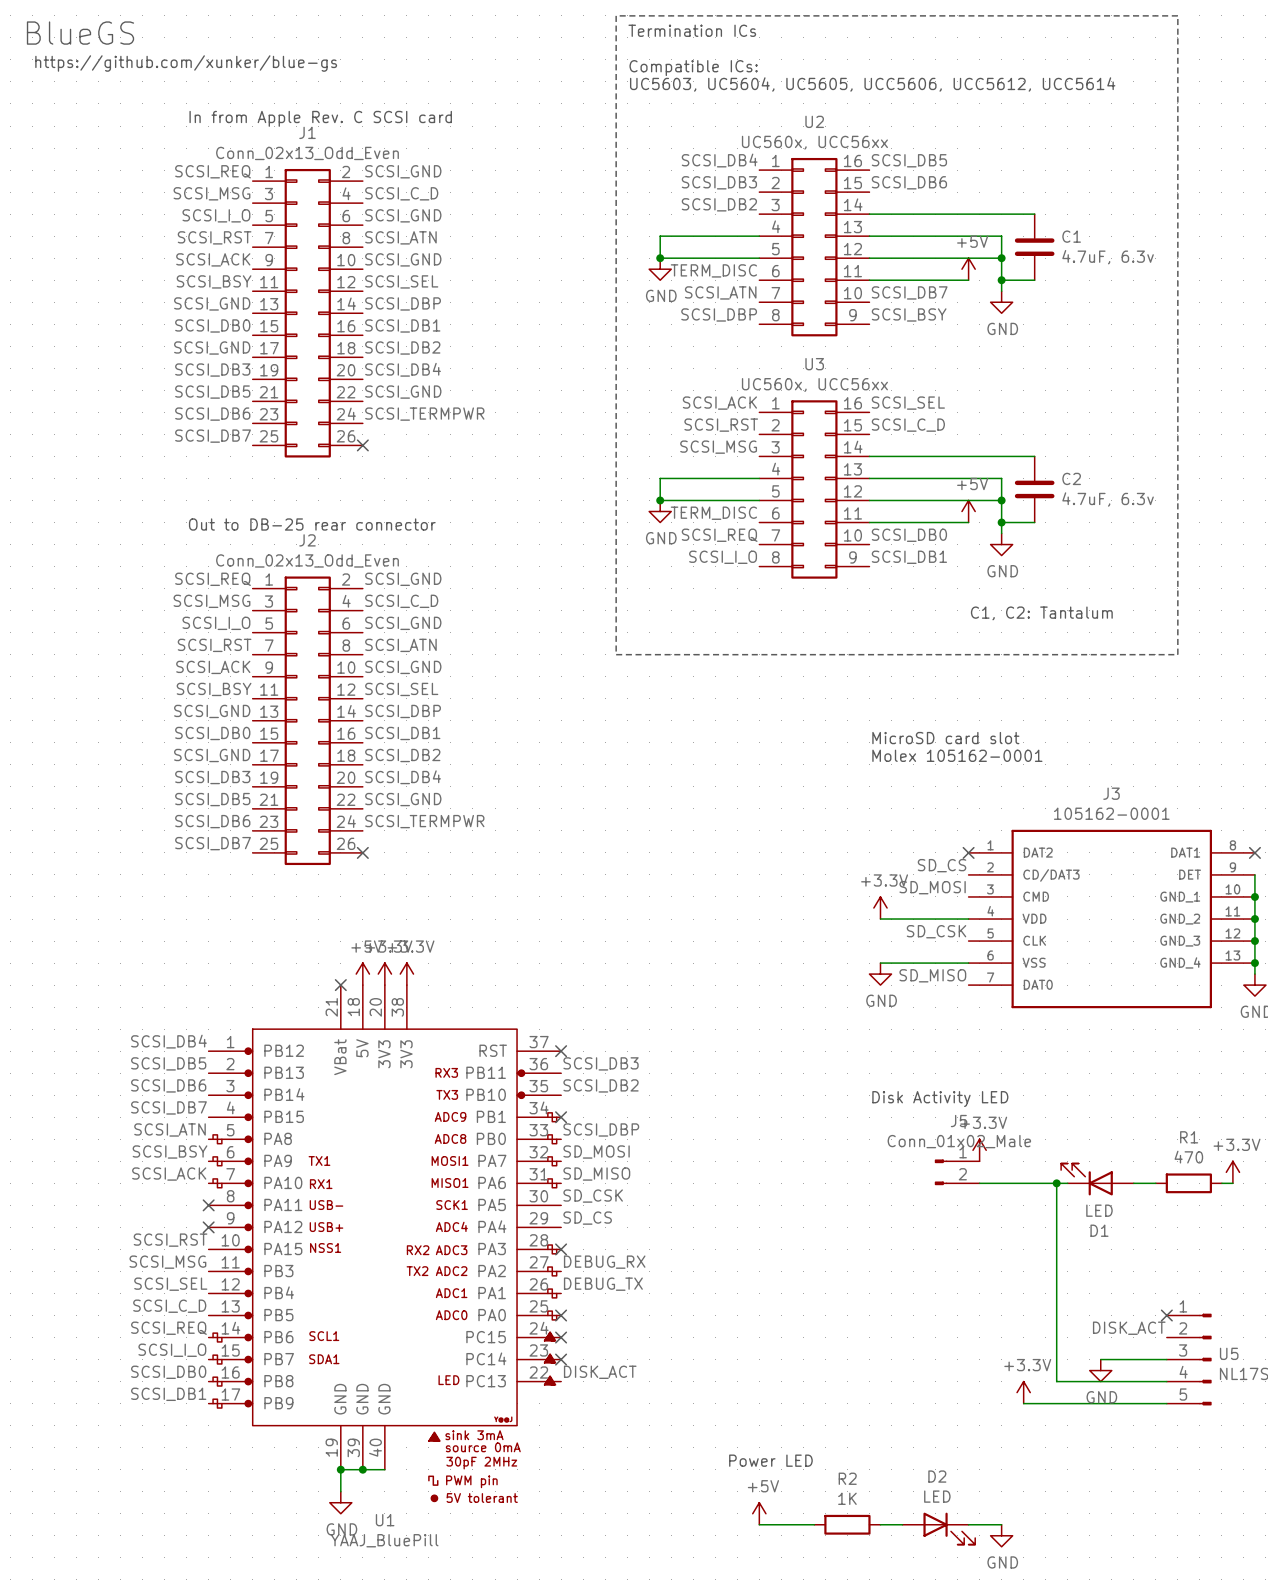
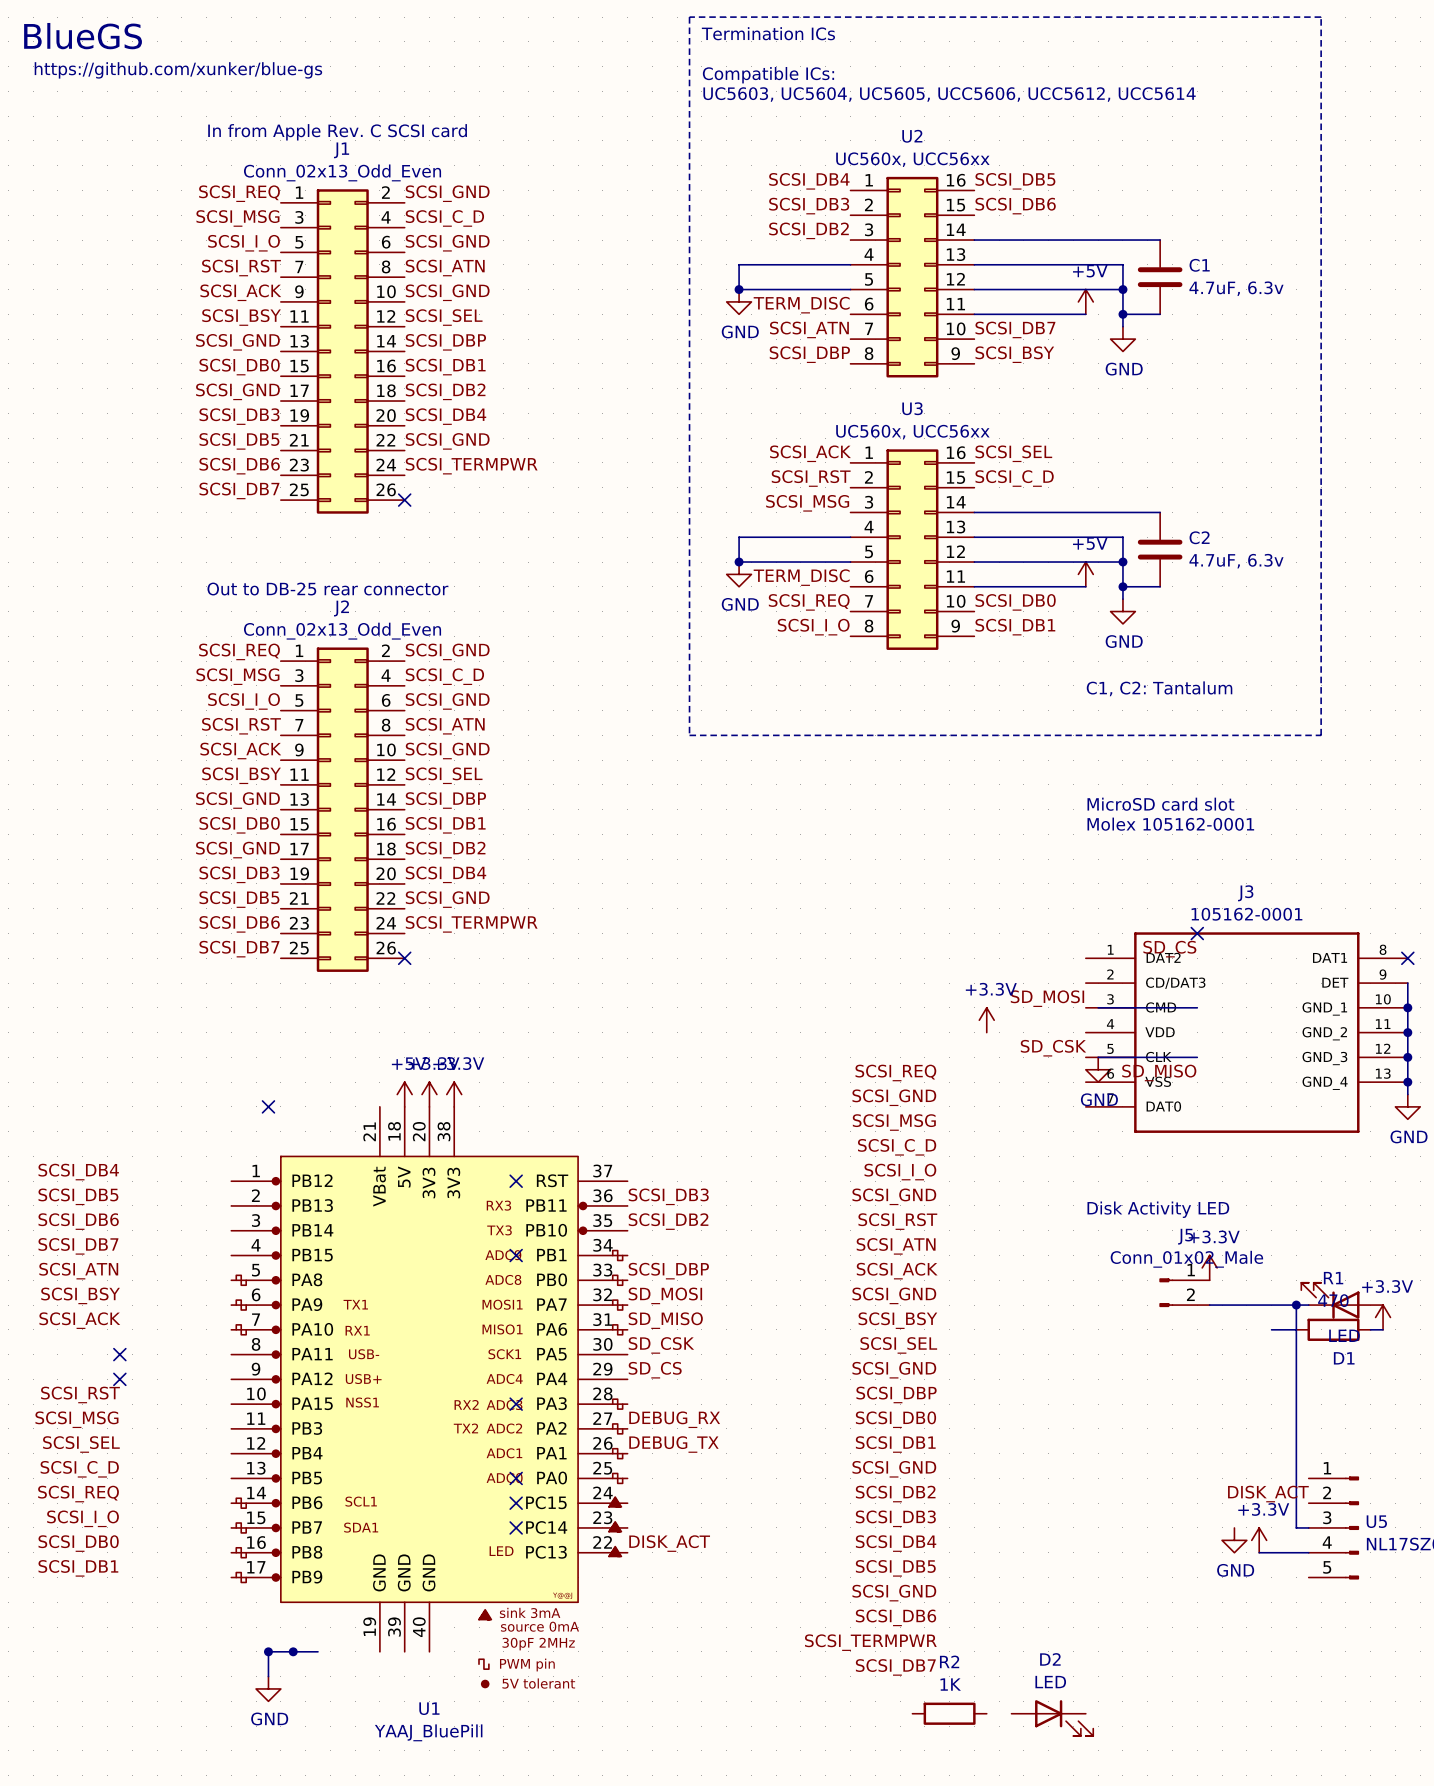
text position: MicroSD card slot (945, 738) -> MicroSD card slot (1160, 804)
text position: Molex 105162-0001 (957, 755) -> Molex 105162-0001 (1170, 824)
no-connect mark: none -> (1197, 933)
no-connect mark: (968, 852) -> none
label position: SD_CS (942, 865) -> SD_CS (1169, 949)
wire: (880, 919) (968, 919) -> (1098, 1007) (1197, 1007)
label: none -> SCSI_REQ (895, 1072)
wire: (880, 963) (968, 963) -> (1098, 1057) (1197, 1057)
power symbol position: GND (880, 974) -> GND (1098, 1069)
label: none -> SCSI_GND (894, 1097)
label position: SD_MISO (932, 975) -> SD_MISO (1159, 1072)
no-connect mark: none -> (268, 1106)
no-connect mark: (340, 985) -> none
label: none -> SCSI_MSG (894, 1122)
label: none -> SCSI_C_D (897, 1147)
label position: SCSI_DB4 (168, 1041) -> SCSI_DB4 (78, 1172)
label: none -> SCSI_I_O (900, 1172)
no-connect mark: none -> (516, 1181)
no-connect mark: (561, 1051) -> none
label position: SCSI_DB5 (168, 1063) -> SCSI_DB5 (78, 1196)
label: none -> SCSI_GND (894, 1196)
label position: SCSI_DB6 (168, 1085) -> SCSI_DB6 (78, 1221)
label: none -> SCSI_RST (897, 1221)
text position: Disk Activity LED (940, 1099) -> Disk Activity LED (1158, 1209)
label position: SCSI_DB7 (168, 1107) -> SCSI_DB7 (78, 1246)
label: none -> SCSI_ATN (896, 1246)
no-connect mark: none -> (516, 1255)
no-connect mark: (561, 1117) -> none
label position: SCSI_ATN (170, 1129) -> SCSI_ATN (78, 1271)
label: none -> SCSI_ACK (897, 1271)
power symbol position: +3.3V (979, 1150) -> +3.3V (1209, 1267)
label position: SCSI_BSY (170, 1152) -> SCSI_BSY (80, 1295)
label: none -> SCSI_GND (894, 1295)
junction: none -> (1296, 1305)
J5 position: (957, 1172) -> (1184, 1292)
label position: SCSI_ACK (169, 1174) -> SCSI_ACK (79, 1320)
label: none -> SCSI_BSY (897, 1320)
D1 position: (1097, 1179) -> (1342, 1300)
wire: (979, 1183) (1067, 1183) -> (1209, 1305) (1308, 1305)
wire: (1056, 1183) (1056, 1381) (1122, 1381) -> none
junction: (1056, 1183) -> none
label: none -> SCSI_SEL (898, 1345)
no-connect mark: none -> (119, 1354)
no-connect mark: (208, 1205) -> none
label: none -> SCSI_GND (894, 1370)
no-connect mark: none -> (119, 1379)
no-connect mark: (208, 1227) -> none
label position: SCSI_RST (170, 1240) -> SCSI_RST (80, 1394)
label: none -> SCSI_DBP (896, 1394)
no-connect mark: none -> (516, 1404)
no-connect mark: (561, 1249) -> none
label position: SCSI_MSG (167, 1262) -> SCSI_MSG (76, 1419)
label: none -> SCSI_DB0 (895, 1419)
label position: SCSI_SEL (170, 1284) -> SCSI_SEL (81, 1444)
label: none -> SCSI_DB1 (895, 1444)
label position: SCSI_C_D (169, 1306) -> SCSI_C_D (79, 1469)
label: none -> SCSI_GND (894, 1469)
no-connect mark: none -> (516, 1478)
no-connect mark: (561, 1315) -> none
no-connect mark: (1166, 1315) -> none
label position: SCSI_REQ (168, 1328) -> SCSI_REQ (78, 1494)
label: none -> SCSI_DB2 (895, 1494)
no-connect mark: none -> (516, 1503)
no-connect mark: (561, 1337) -> none
label position: SCSI_I_O (172, 1350) -> SCSI_I_O (83, 1518)
label: none -> SCSI_DB3 (895, 1518)
no-connect mark: none -> (516, 1527)
no-connect mark: (561, 1359) -> none
wire: (1100, 1359) (1155, 1359) -> (1296, 1305) (1296, 1527)
label position: SCSI_DB0 (168, 1372) -> SCSI_DB0 (78, 1543)
label: none -> SCSI_DB4 (896, 1543)
power symbol position: +3.3V (1023, 1392) -> +3.3V (1259, 1540)
label position: SCSI_DB1 (168, 1394) -> SCSI_DB1 (78, 1568)
label: none -> SCSI_DB5 (895, 1568)
wire: (1023, 1403) (1166, 1403) -> none
label: none -> SCSI_GND (894, 1593)
label: none -> SCSI_DB6 (896, 1617)
text: Power LED (770, 1460) -> none
label: none -> SCSI_TERMPWR (870, 1642)
junction: none -> (268, 1651)
junction: none -> (293, 1651)
junction: (340, 1469) -> none
junction: (362, 1469) -> none
wire: (384, 1469) (340, 1469) (340, 1491) -> (318, 1651) (268, 1651) (268, 1676)
label: none -> SCSI_DB7 (895, 1667)
power symbol position: GND (340, 1502) -> GND (268, 1688)
power symbol: +5V (759, 1513) -> none
wire: (759, 1524) (814, 1524) -> none
wire: (880, 1524) (902, 1524) -> none
wire: (968, 1524) (1001, 1524) -> none
power symbol: GND (1001, 1535) -> none

